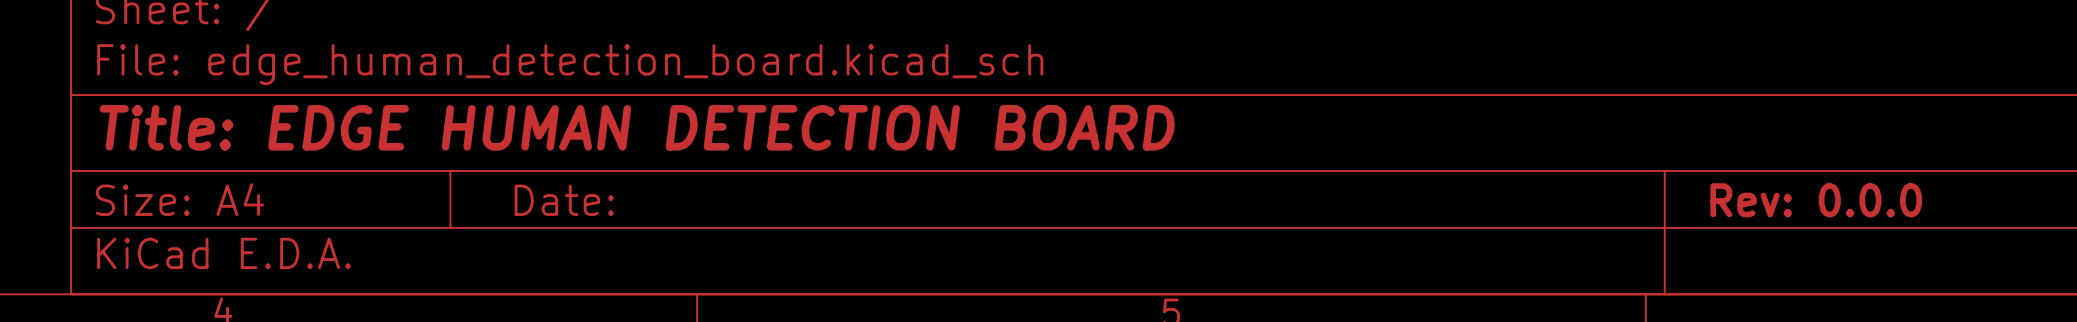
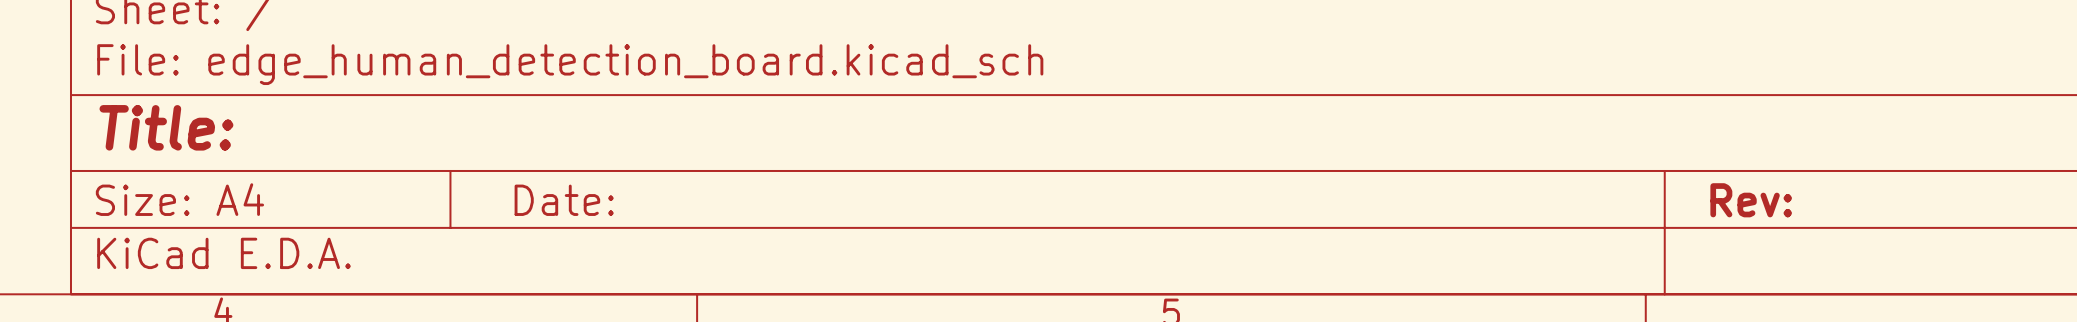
title block: Title: EDGE HUMAN DETECTION BOARD (637, 127) -> Title: (166, 127)
title block: Rev: 0.0.0 (1816, 200) -> Rev: (1751, 200)

